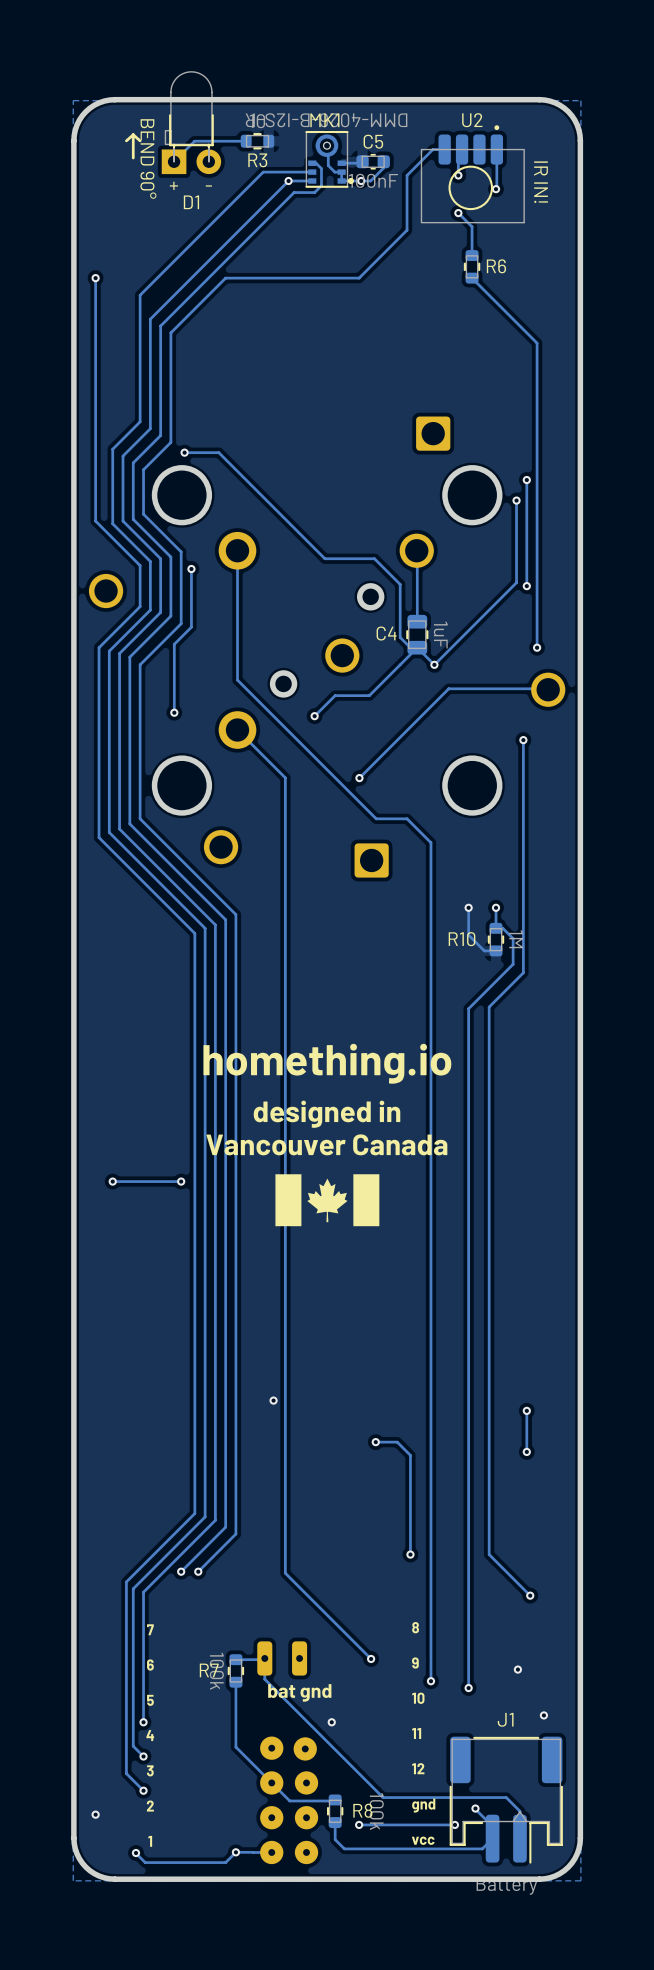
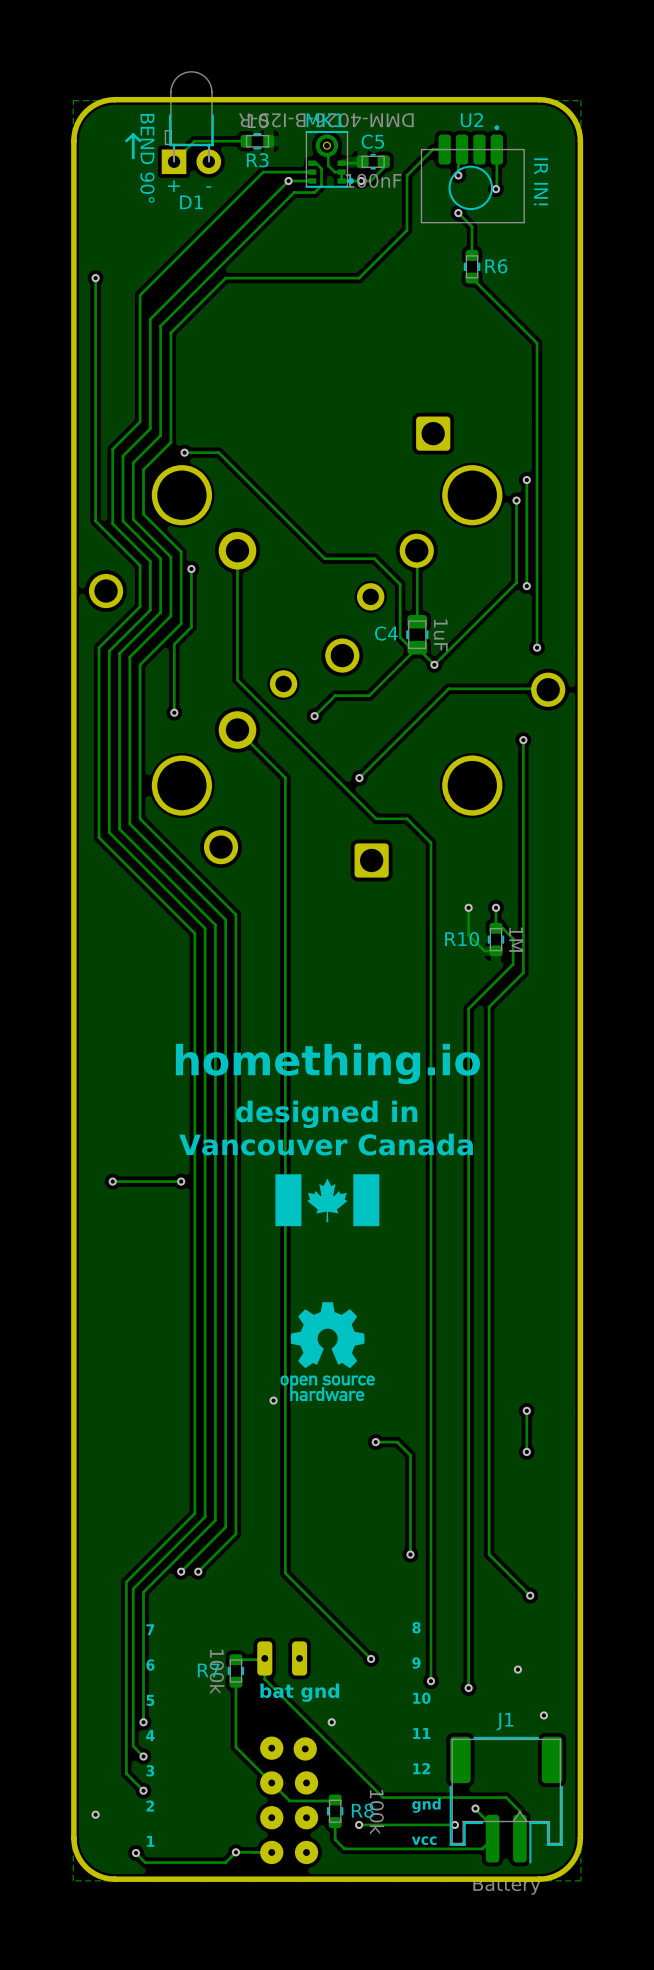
drawing: none -> [280, 1302, 375, 1402]

